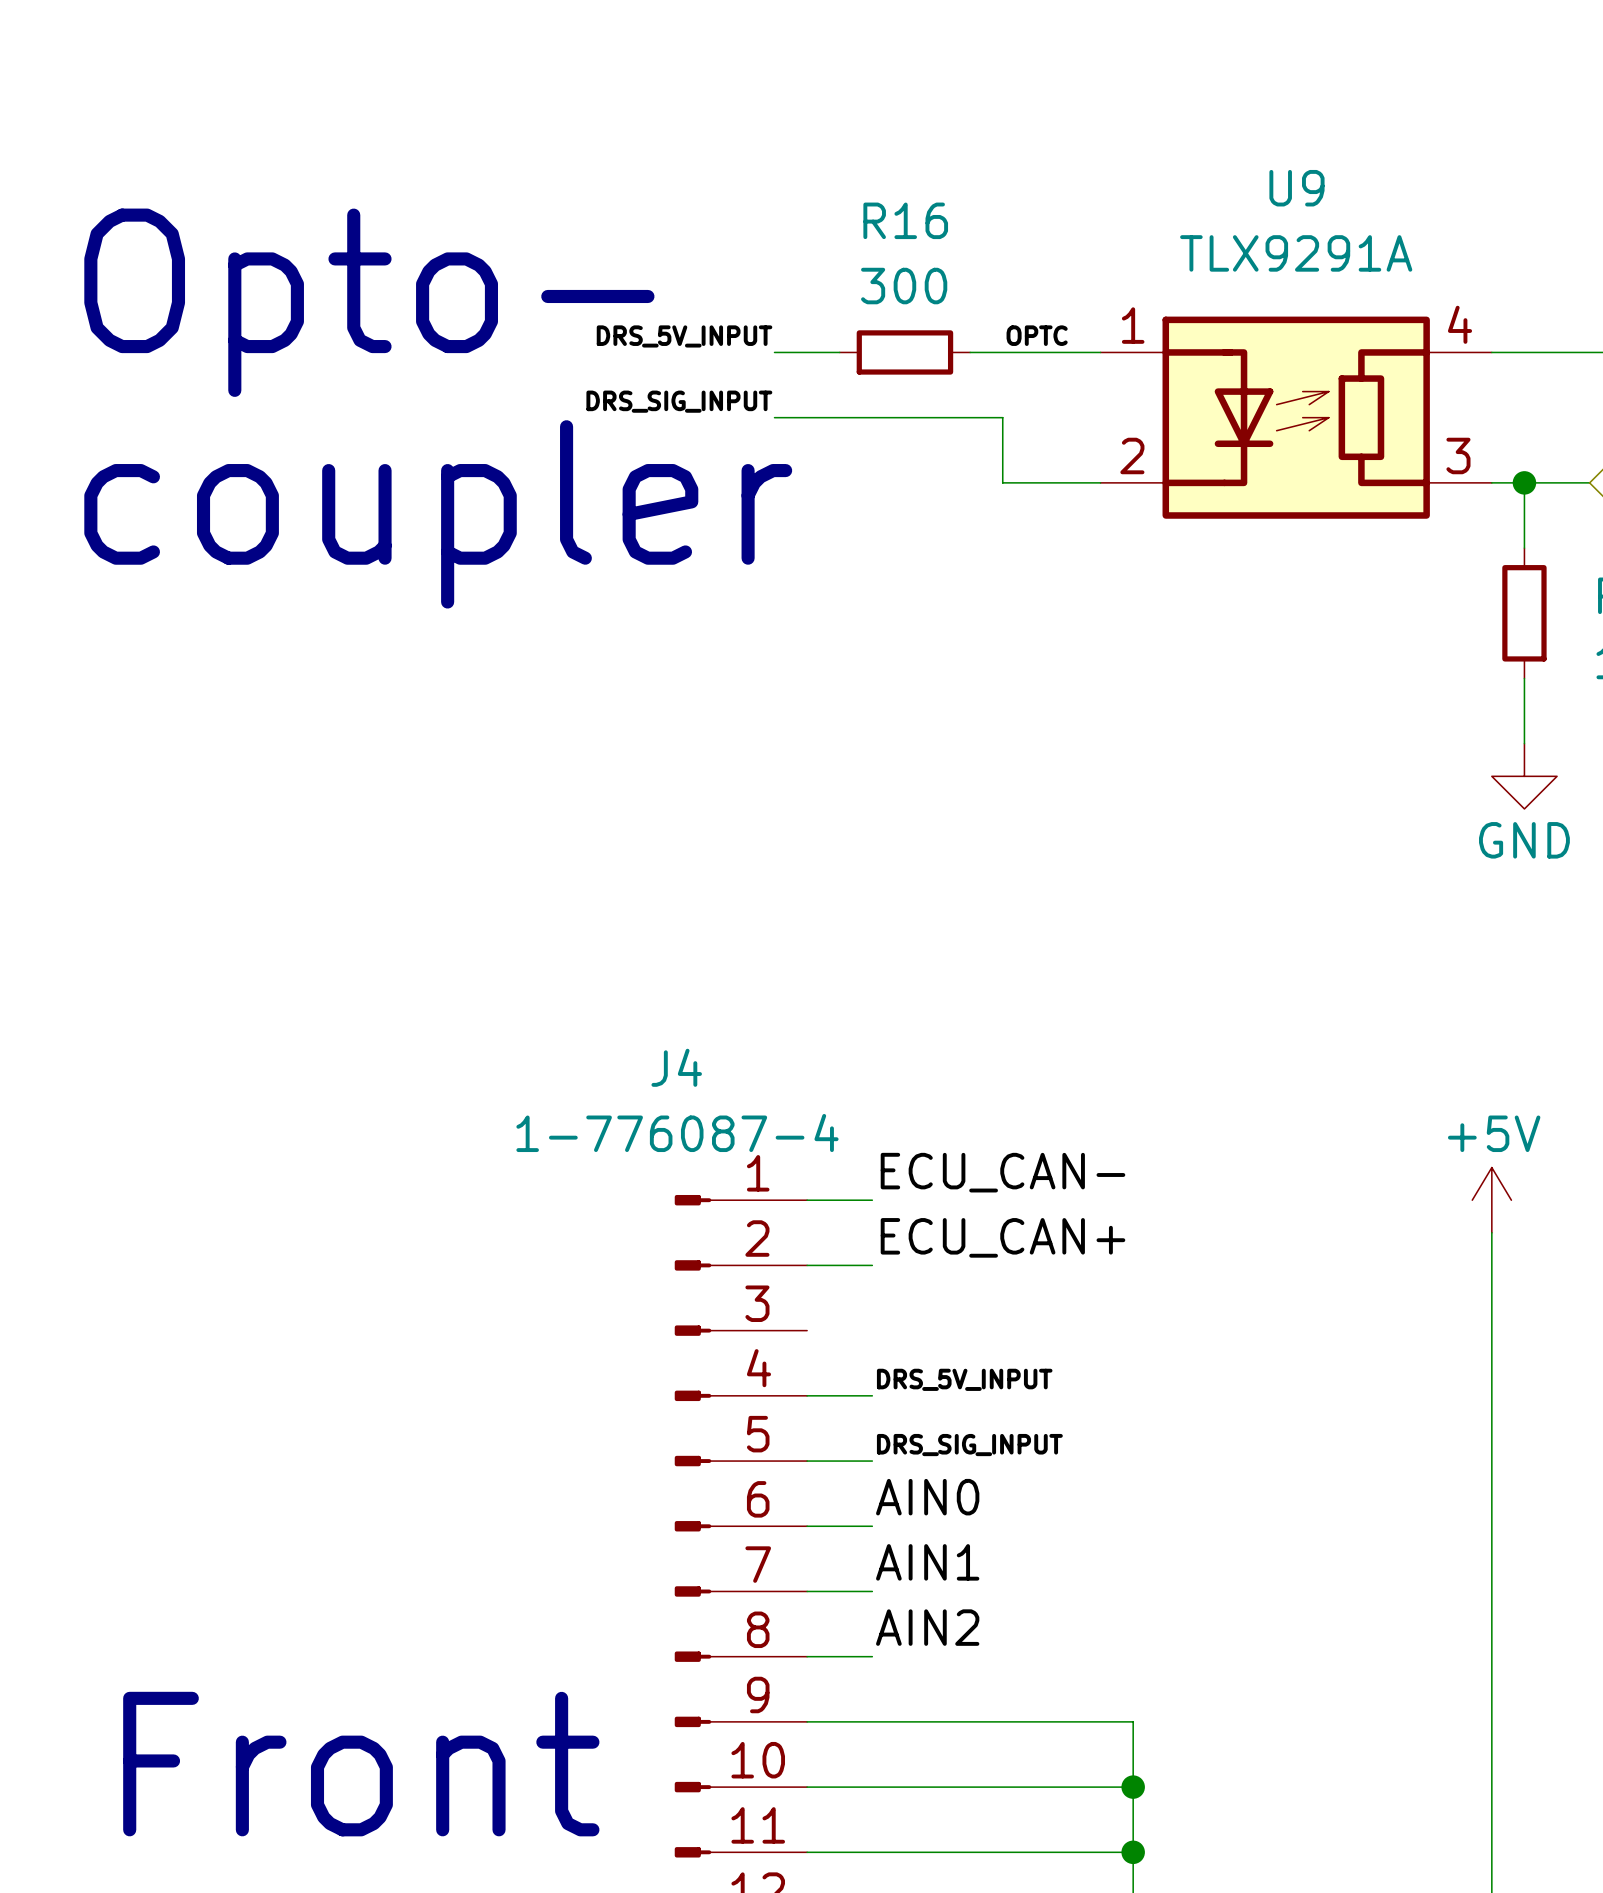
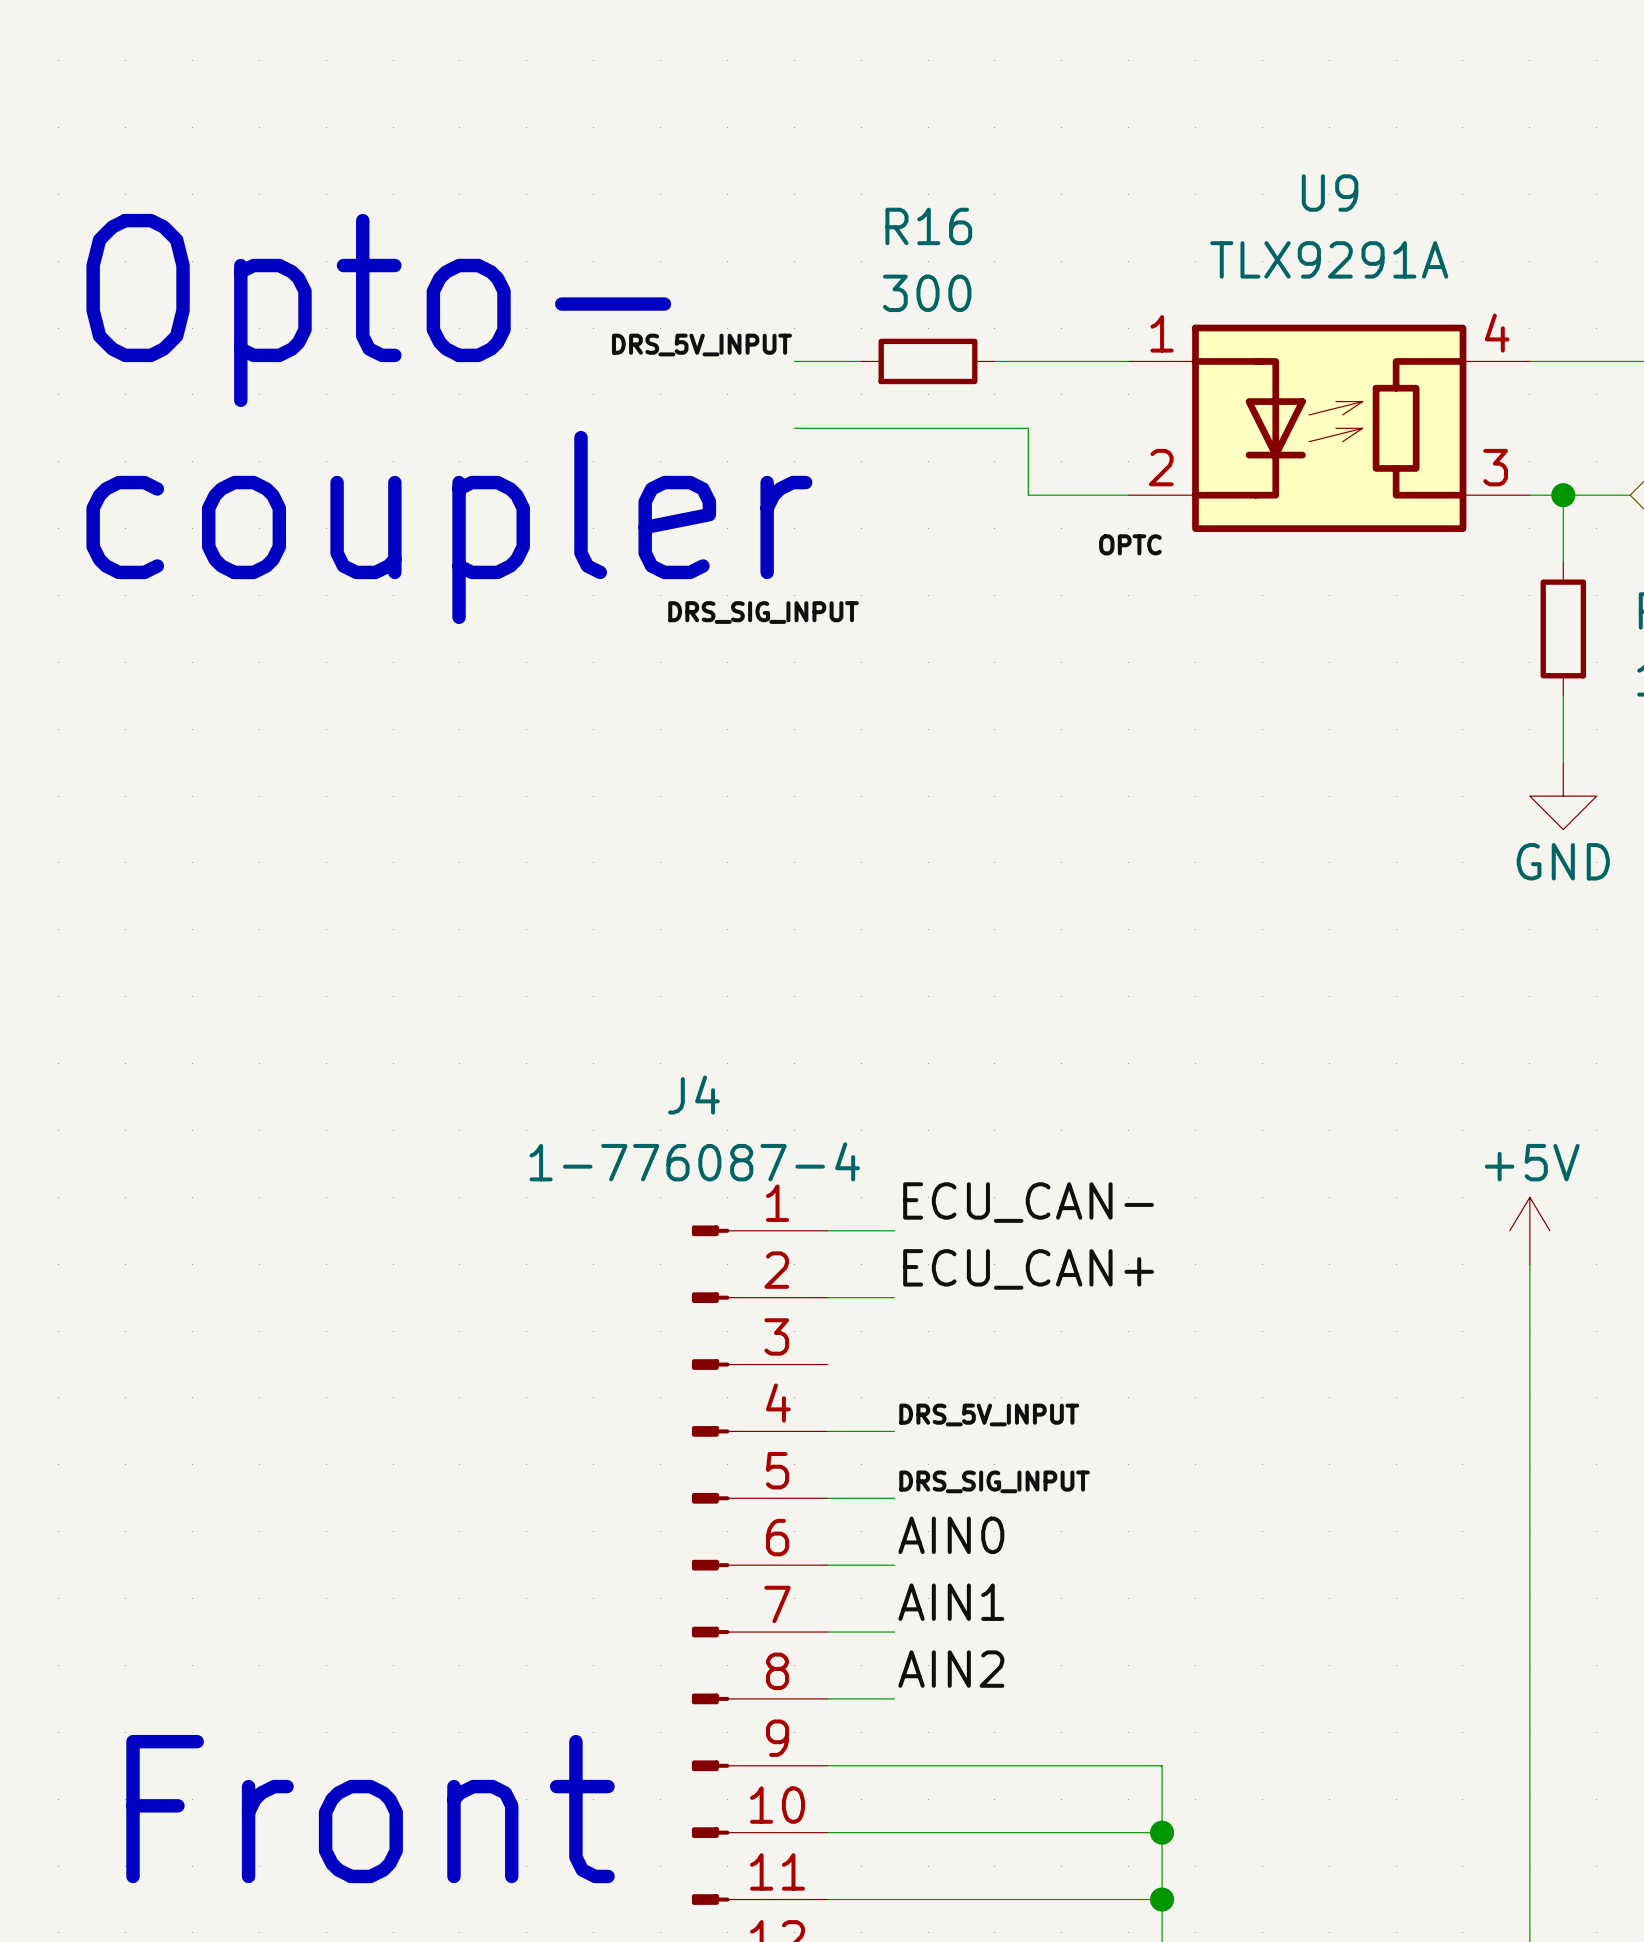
label position: OPTC (1037, 335) -> OPTC (1130, 544)
label position: DRS_SIG_INPUT (679, 401) -> DRS_SIG_INPUT (763, 612)

